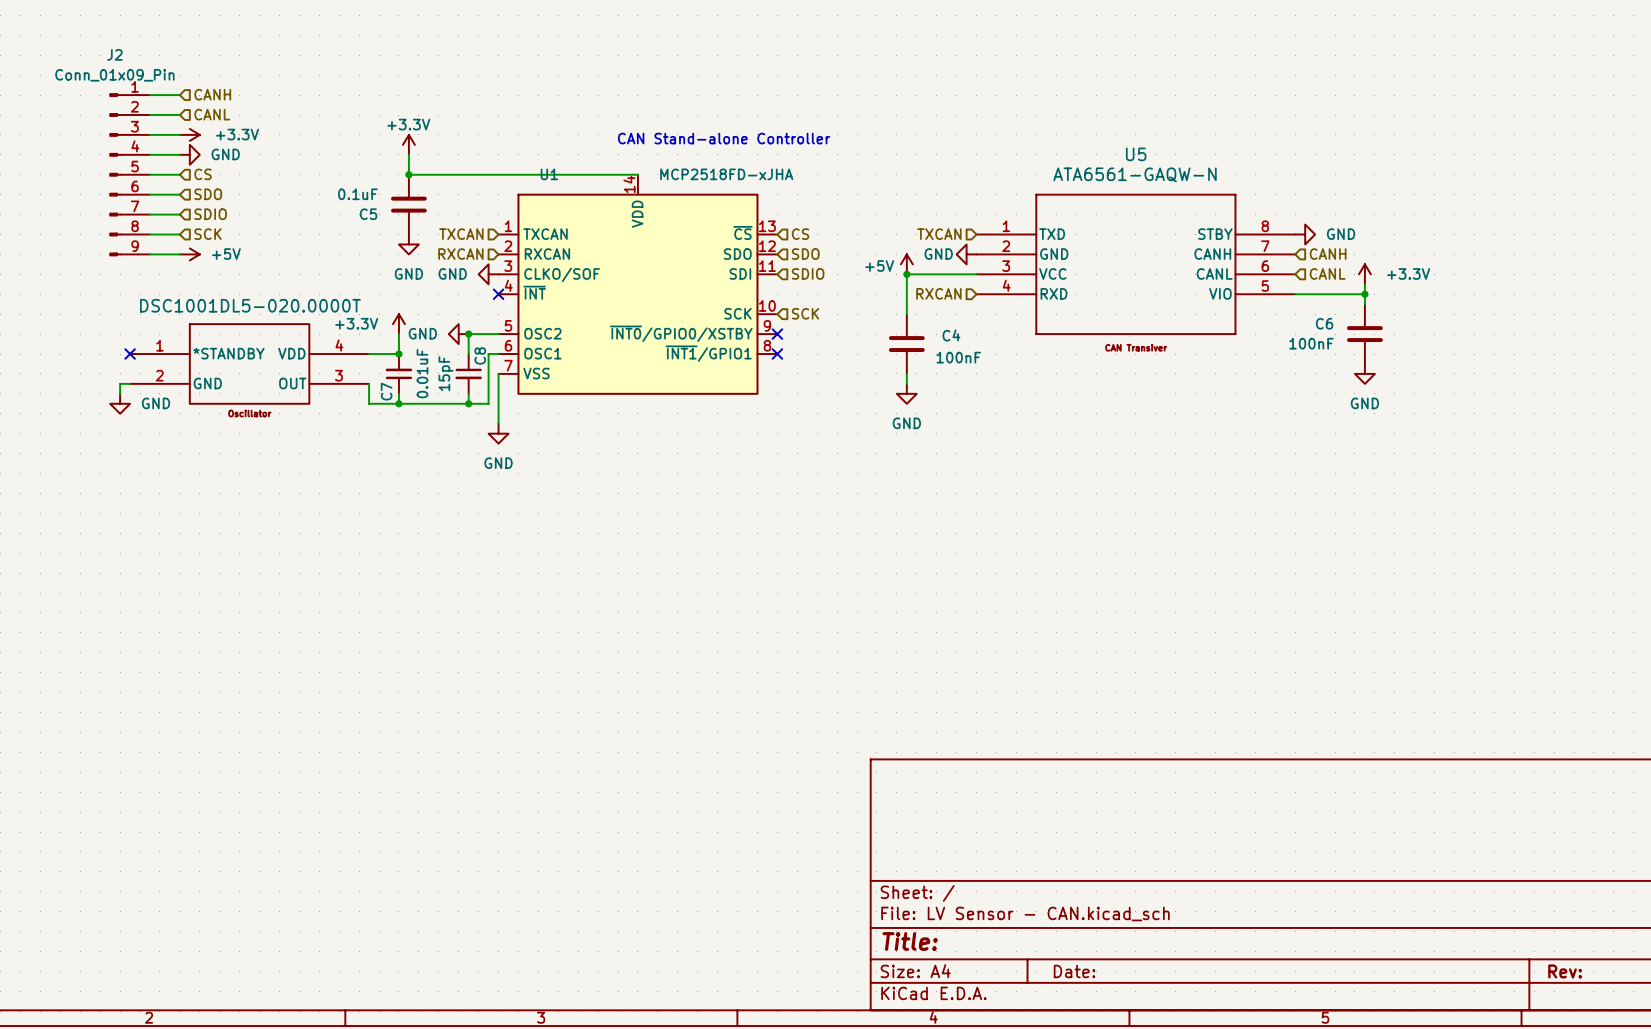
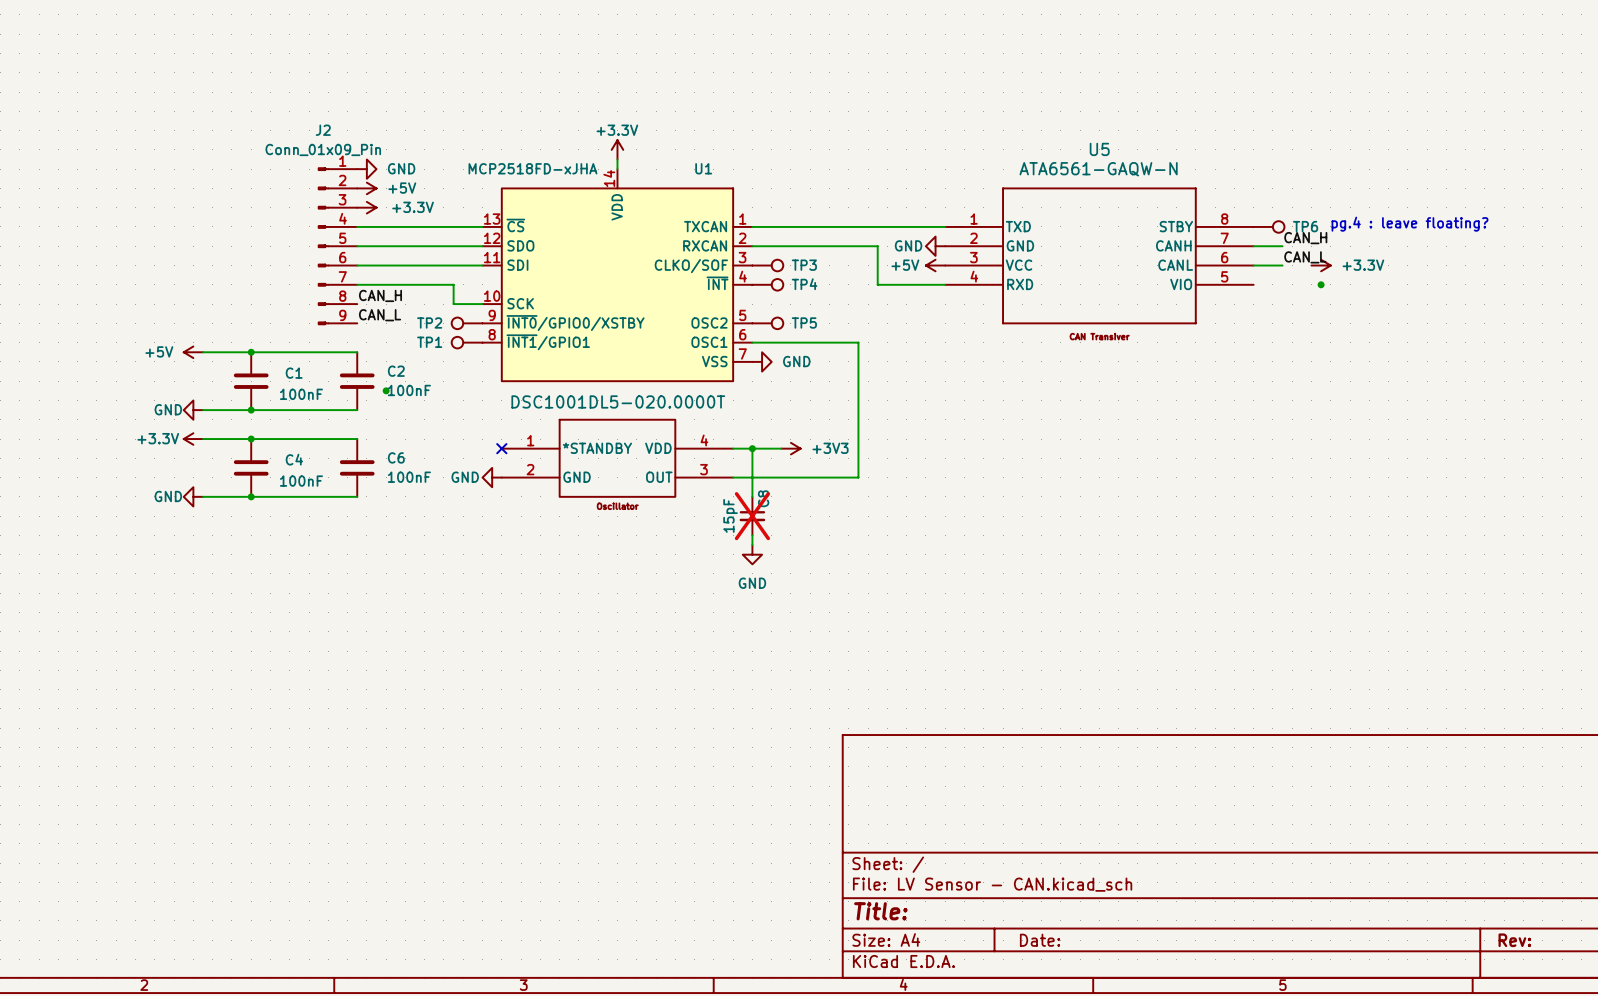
hierarchical label: CANH (212, 94) -> none
wire: (150, 95) (179, 95) -> none
hierarchical label: CANL (212, 114) -> none
wire: (150, 115) (179, 115) -> none
wire: (150, 134) (179, 134) -> none
power symbol: +3.3V (189, 134) -> none
text: CAN Stand-alone Controller (724, 138) -> none
power symbol: +3.3V (408, 144) -> none
wire: (150, 154) (179, 154) -> none
power symbol: GND (189, 154) -> none
wire: (408, 154) (408, 174) (637, 174) -> (617, 159) (617, 169)
power symbol: none -> +3.3V (617, 149)
J2 position: (129, 174) -> (337, 246)
wire: (150, 174) (179, 174) -> none
hierarchical label: CS (203, 174) -> none
power symbol: none -> GND (366, 169)
junction: (408, 174) -> none
wire: (150, 194) (179, 194) -> none
hierarchical label: SDO (208, 194) -> none
power symbol: none -> +5V (366, 188)
C5: 0.1uF (408, 204) -> none
wire: (150, 214) (179, 214) -> none
hierarchical label: SDIO (210, 214) -> none
power symbol: none -> +3.3V (366, 207)
text: none -> pg.4 : leave floating? (1410, 224)
wire: (150, 234) (179, 234) -> none
hierarchical label: SCK (208, 234) -> none
wire: none -> (357, 226) (482, 226)
hierarchical label: TXCAN (461, 234) -> none
wire: none -> (752, 226) (945, 226)
hierarchical label: CS (800, 234) -> none
hierarchical label: TXCAN (939, 234) -> none
power symbol: GND (1305, 234) -> none
TP6: none -> (1269, 226)
power symbol: GND (408, 244) -> none
label: none -> CAN_H (1305, 238)
wire: (150, 254) (179, 254) -> none
power symbol: +5V (189, 254) -> none
wire: none -> (357, 246) (482, 246)
hierarchical label: RXCAN (460, 254) -> none
hierarchical label: SDO (805, 254) -> none
wire: none -> (1253, 246) (1282, 246)
hierarchical label: CANH (1328, 254) -> none
power symbol rotation: 0° (906, 264) -> 90° counterclockwise (935, 265)
power symbol position: +5V (906, 264) -> +5V (935, 265)
label: none -> CAN_L (1305, 257)
hierarchical label: SDIO (808, 273) -> none
hierarchical label: CANL (1327, 273) -> none
wire: none -> (357, 265) (482, 265)
power symbol: GND (488, 274) -> none
TP3: none -> (767, 265)
wire: (906, 274) (976, 274) -> (877, 265) (877, 246) (752, 246)
junction: (906, 274) -> none
wire: none -> (1253, 265) (1282, 265)
power symbol rotation: 0° (1364, 274) -> 90° clockwise (1321, 265)
wire: (1364, 284) (1364, 304) -> none
hierarchical label: RXCAN (938, 293) -> none
wire: none -> (357, 284) (453, 284) (453, 304) (482, 304)
no-connect mark: (498, 294) -> none
U1 flip: as is (637, 294) -> left-right (617, 284)
TP4: none -> (767, 284)
wire: (906, 294) (906, 314) -> (877, 284) (945, 284)
wire: (1295, 294) (1364, 294) -> none
label: none -> CAN_H (380, 295)
hierarchical label: SCK (805, 313) -> none
C6 name position: C6 (1324, 323) -> C6 (396, 457)
power symbol: +3.3V (398, 324) -> none
label: none -> CAN_L (380, 315)
wire: (398, 334) (398, 354) (369, 354) -> none
power symbol: GND (458, 334) -> none
junction: (468, 334) -> none
TP2: none -> (467, 323)
no-connect mark: (777, 334) -> none
TP5: none -> (767, 323)
C6 position: (1364, 334) -> (357, 467)
C6 value position: 100nF (1311, 343) -> 100nF (409, 477)
C4 position: (906, 344) -> (251, 467)
no-connect mark: (130, 354) -> none
junction: (398, 354) -> none
TP1: none -> (467, 342)
wire: (498, 354) (488, 354) (488, 403) (369, 403) (369, 383) -> none
wire: none -> (752, 342) (858, 342) (858, 477) (733, 477)
no-connect mark: (777, 354) -> none
power symbol: none -> +5V (193, 352)
wire: none -> (203, 352) (357, 352)
part: DSC1001DL5-020.0000T (249, 363) -> none
junction: none -> (251, 352)
C7: 0.01uF (398, 373) -> none
C8 position: (468, 373) -> (752, 516)
wire: (498, 373) (498, 423) -> none
power symbol: none -> GND (762, 361)
wire: (906, 373) (906, 383) -> none
power symbol: GND (1364, 373) -> none
wire: (130, 383) (120, 383) (120, 393) -> none
C1: none -> 100nF (251, 381)
C2: none -> 100nF (357, 381)
wire: (398, 393) (398, 403) -> none
wire: (468, 393) (468, 403) -> none
power symbol: GND (906, 393) -> none
power symbol: GND (120, 403) -> none
junction: (468, 403) -> none
power symbol: none -> GND (193, 410)
wire: none -> (203, 410) (357, 410)
junction: none -> (251, 410)
power symbol rotation: 0° (498, 433) -> 90° clockwise (492, 477)
power symbol position: GND (498, 433) -> GND (492, 477)
power symbol: none -> +3.3V (193, 439)
wire: none -> (203, 439) (357, 439)
junction: none -> (251, 439)
no-connect mark: none -> (501, 448)
wire: none -> (733, 448) (781, 448)
wire: none -> (752, 448) (752, 496)
junction: none -> (752, 448)
power symbol: none -> +3V3 (790, 448)
part: none -> DSC1001DL5-020.0000T (617, 458)
power symbol: none -> GND (193, 496)
wire: none -> (203, 496) (357, 496)
junction: none -> (251, 496)
C8 do-not-place cross: none -> (752, 516)
wire: none -> (752, 535) (752, 545)
power symbol: none -> GND (752, 554)

